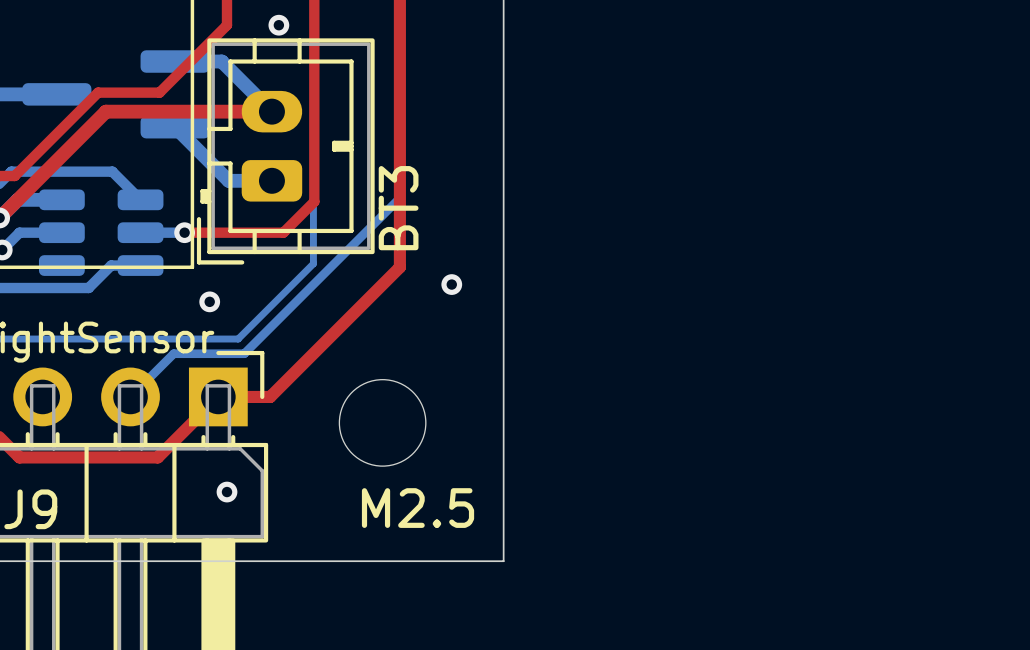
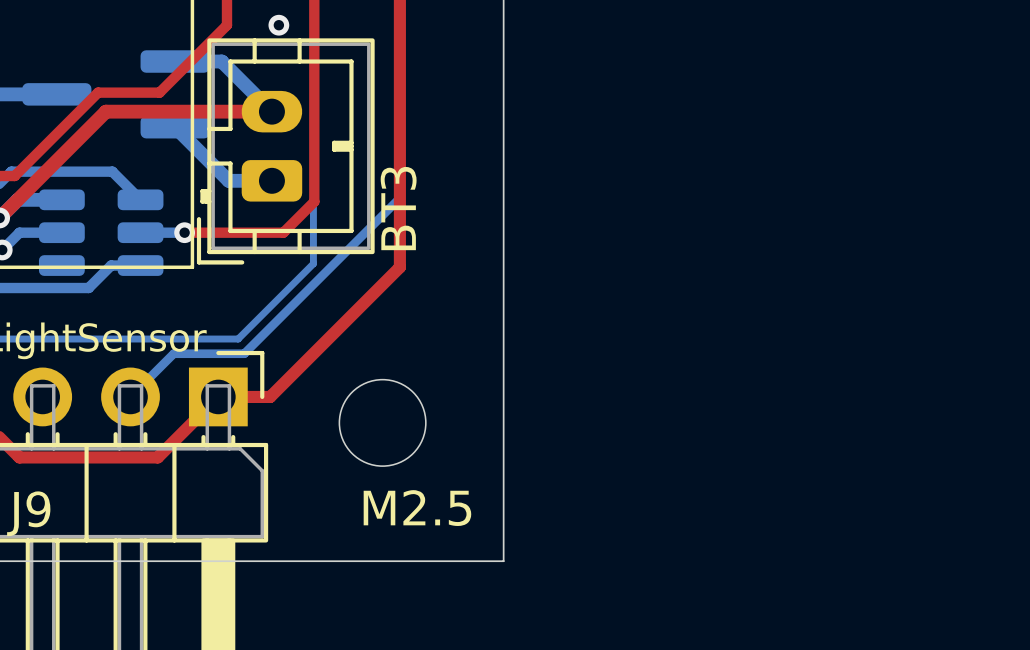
via: (451, 284) -> none
via: (209, 301) -> none
via: (227, 492) -> none

